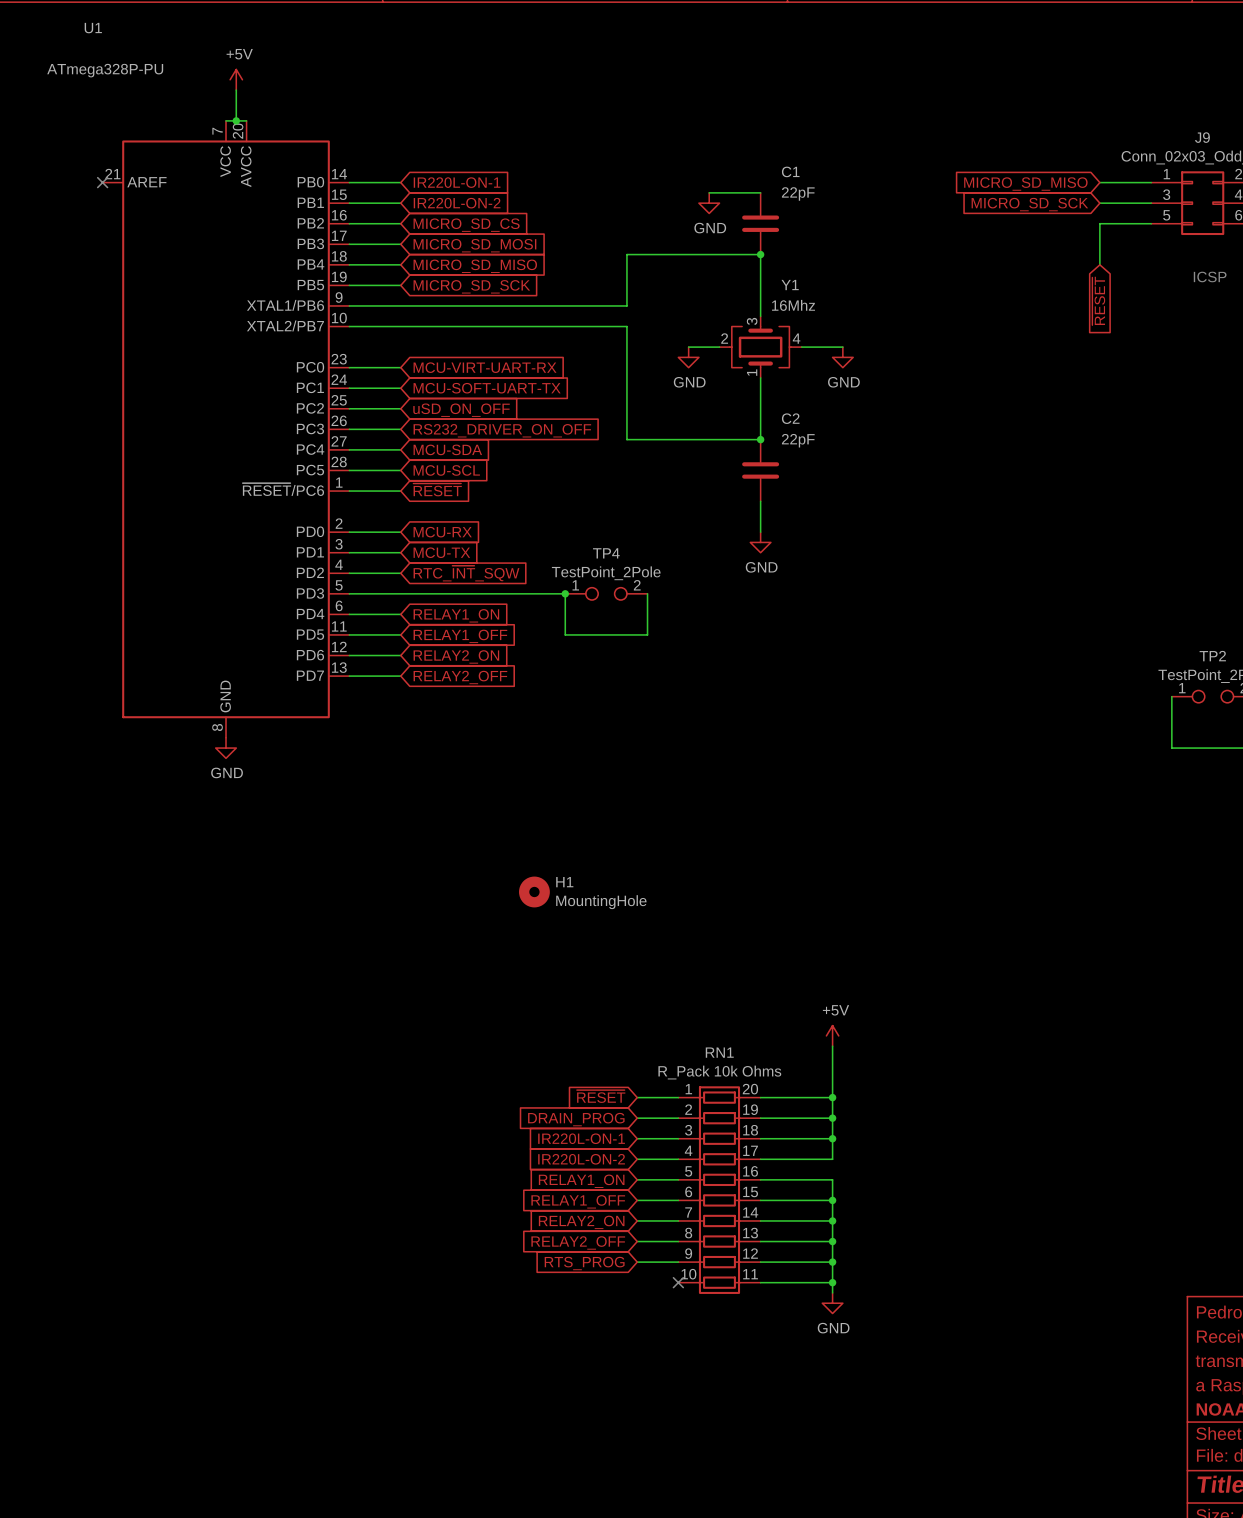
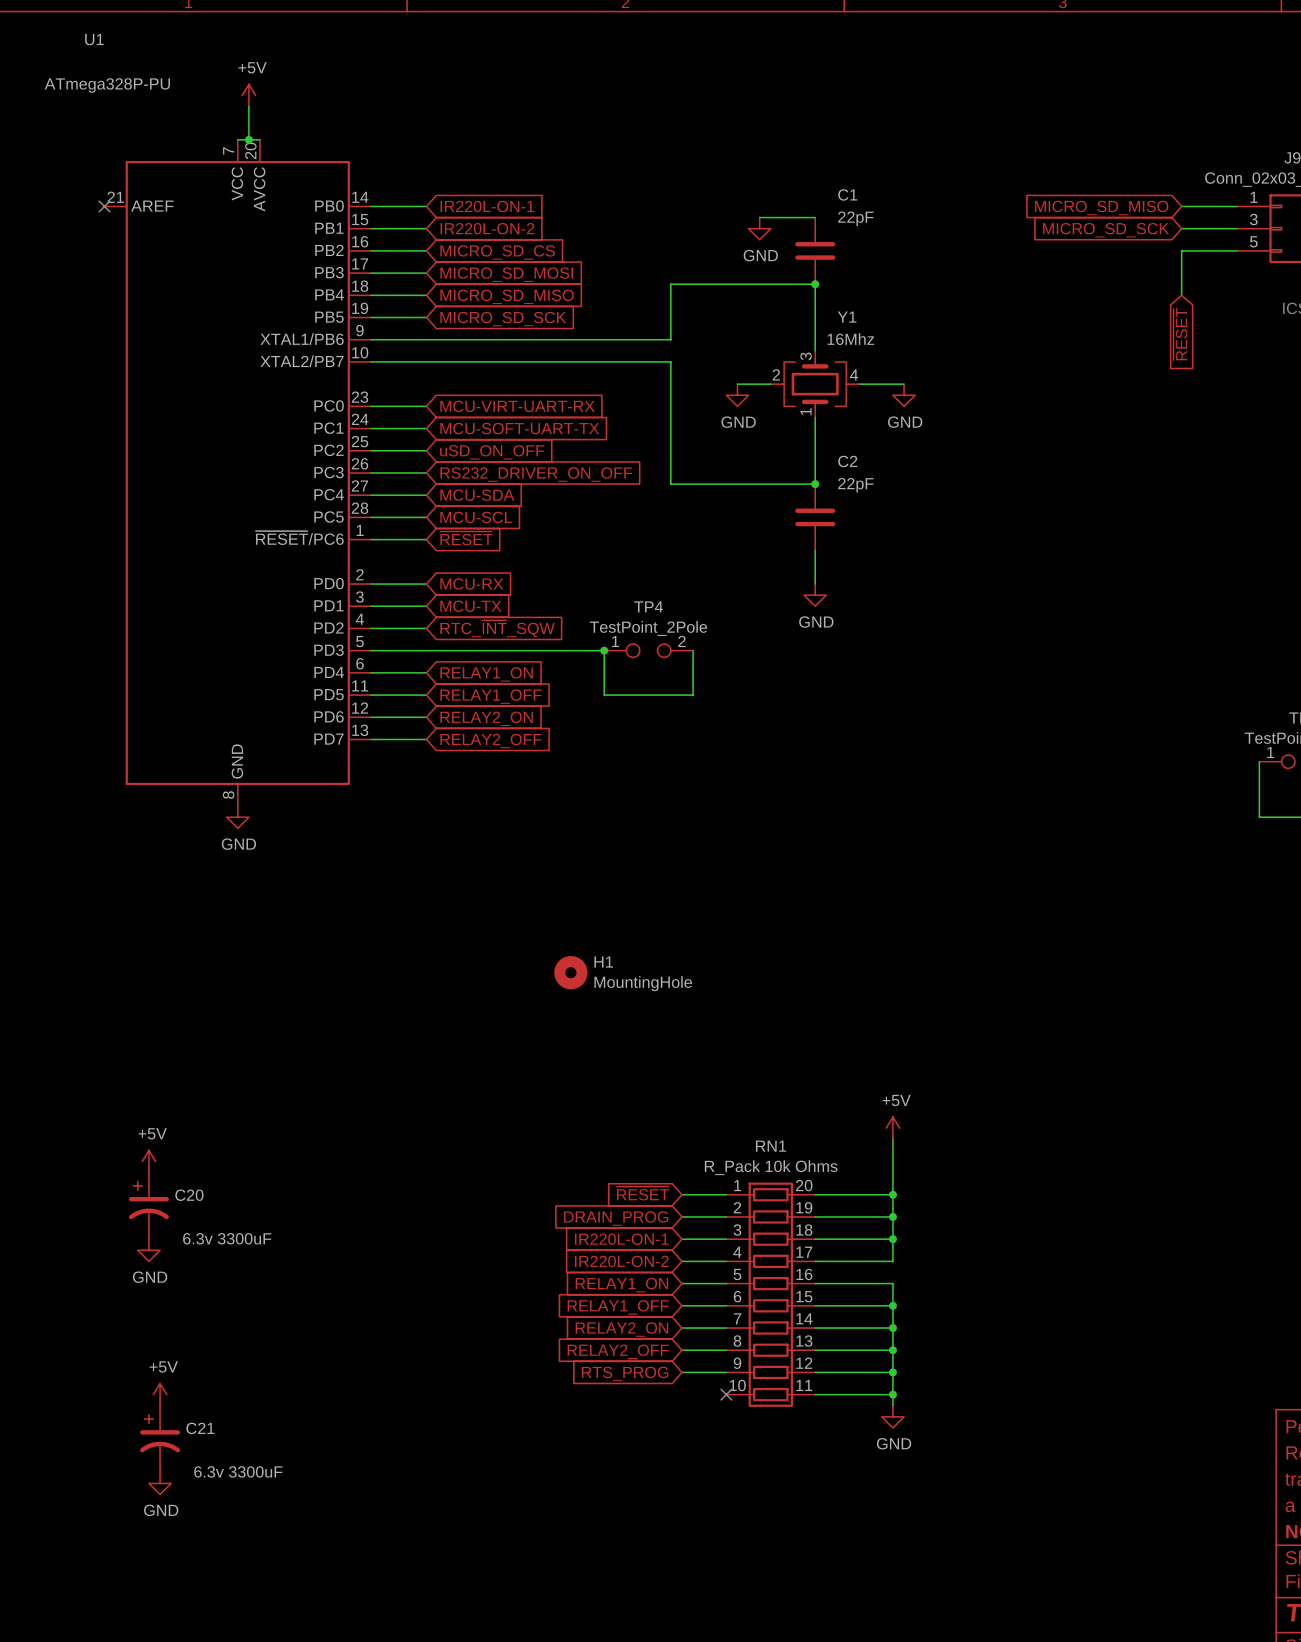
power symbol: none -> +5V (148, 1161)
C20: none -> 6.3v 3300uF (148, 1205)
power symbol: none -> GND (148, 1250)
power symbol: none -> +5V (160, 1394)
C21: none -> 6.3v 3300uF (160, 1439)
power symbol: none -> GND (160, 1483)

